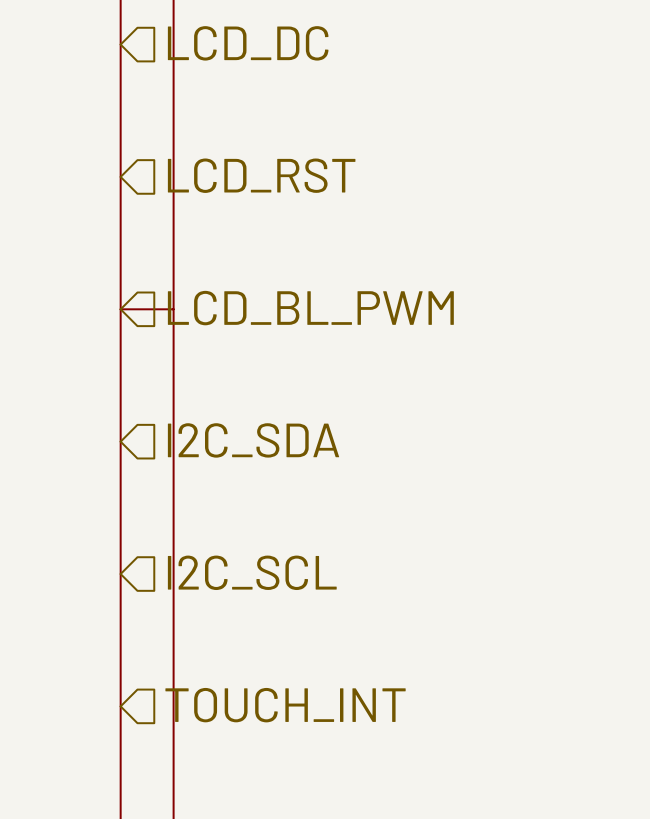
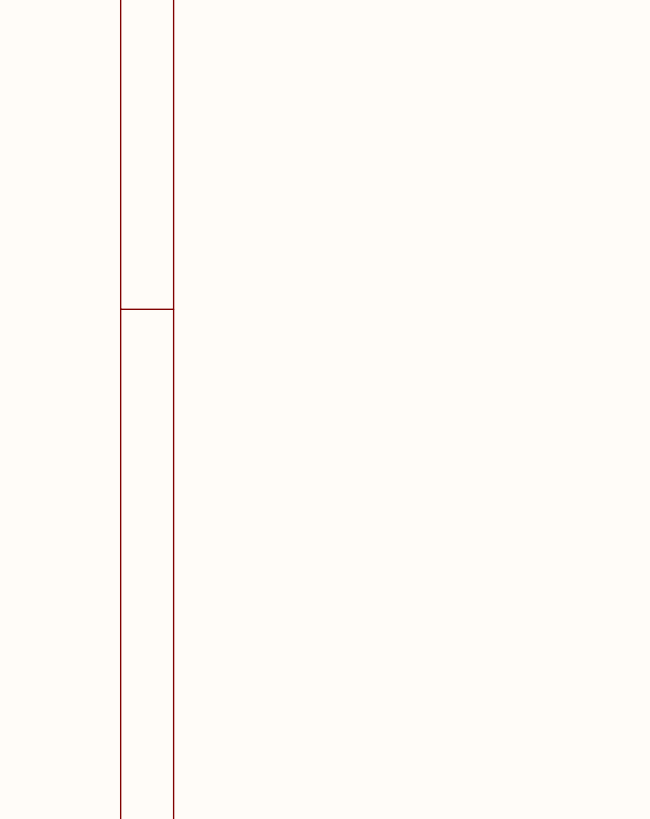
hierarchical label: LCD_DC (248, 43) -> none
hierarchical label: LCD_RST (261, 175) -> none
hierarchical label: LCD_BL_PWM (310, 308) -> none
hierarchical label: I2C_SDA (253, 440) -> none
hierarchical label: I2C_SCL (252, 572) -> none
hierarchical label: TOUCH_INT (285, 705) -> none

